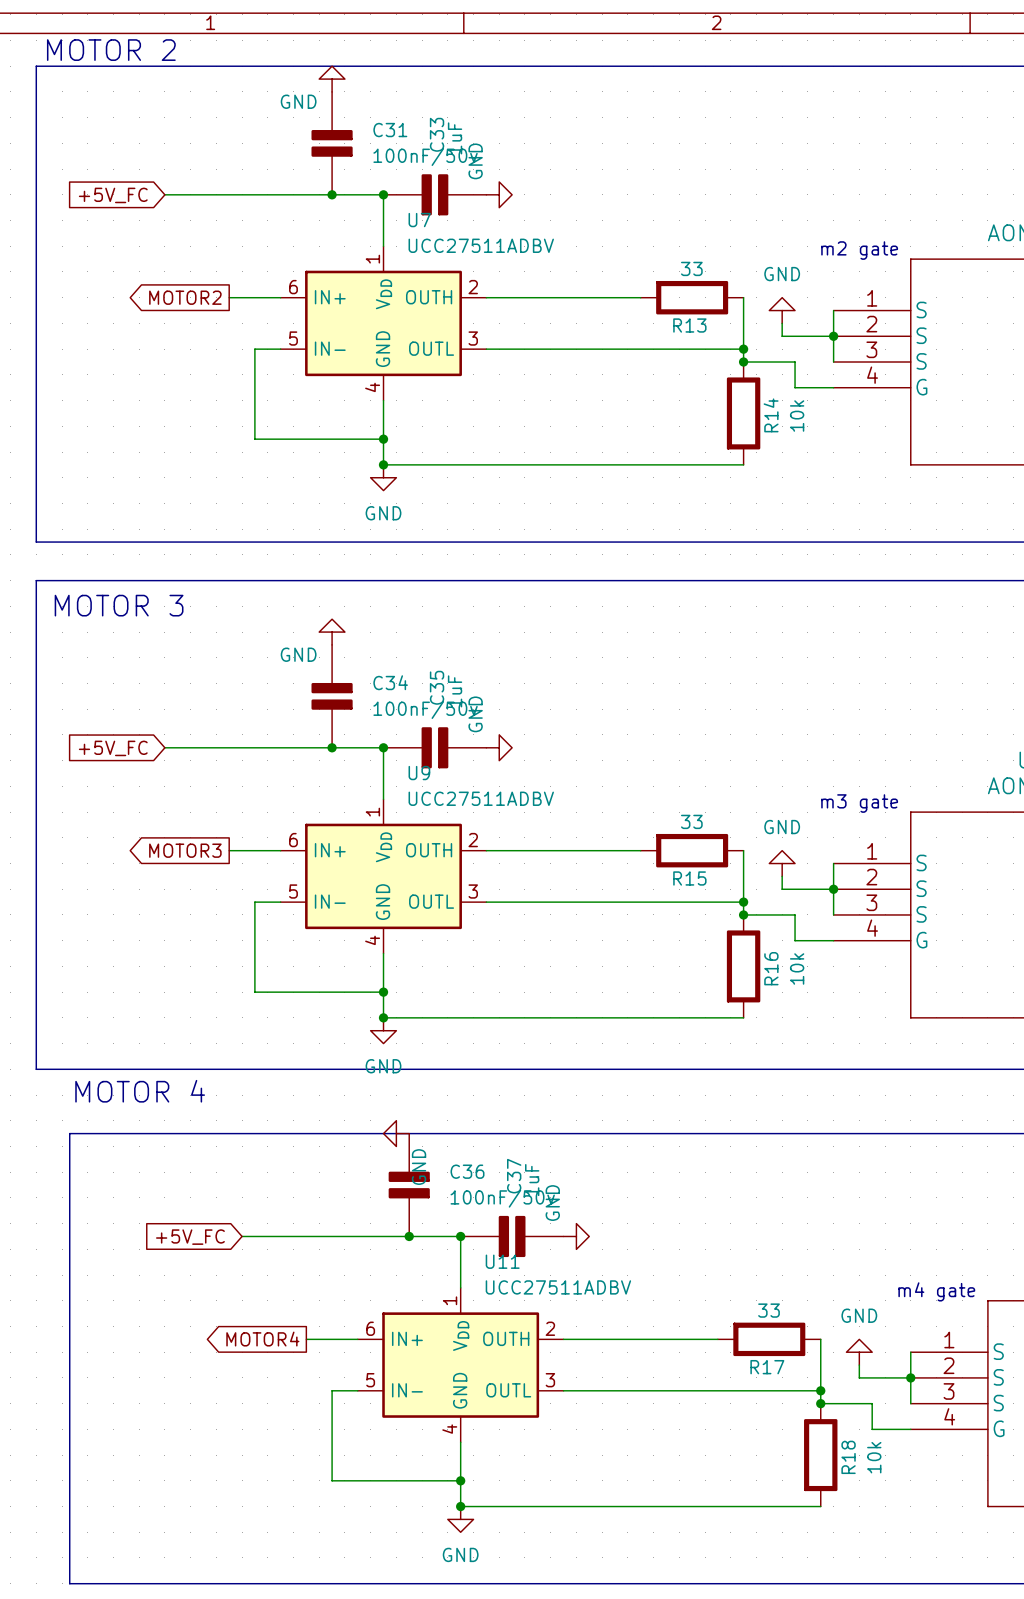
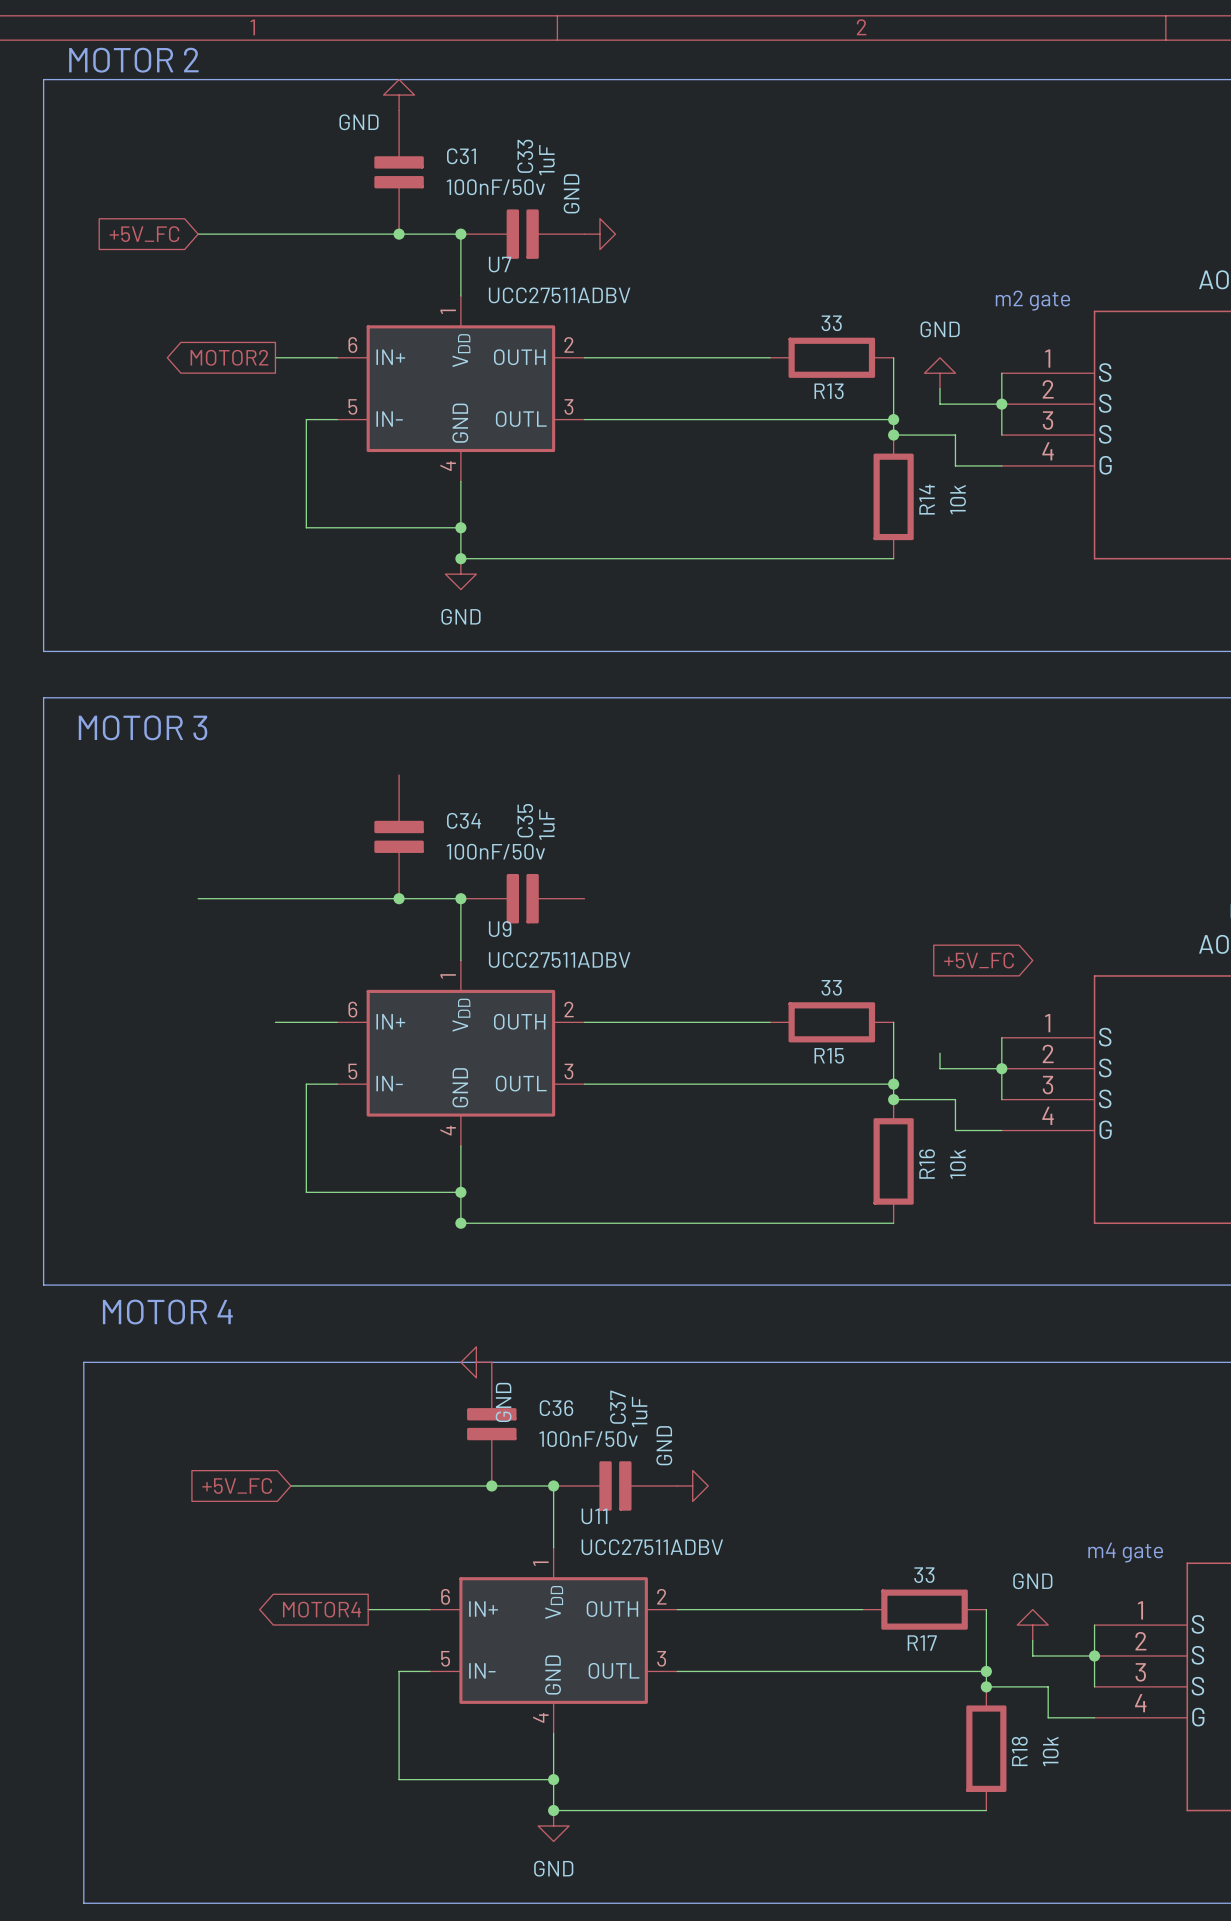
power symbol: GND (332, 632) -> none
power symbol: GND (499, 747) -> none
global label: +5V_FC (113, 748) -> none
global label: none -> +5V_FC (979, 960)
text: m3 gate (859, 803) -> none
global label: MOTOR3 (185, 850) -> none
power symbol: GND (782, 863) -> none
power symbol: GND (383, 1030) -> none

